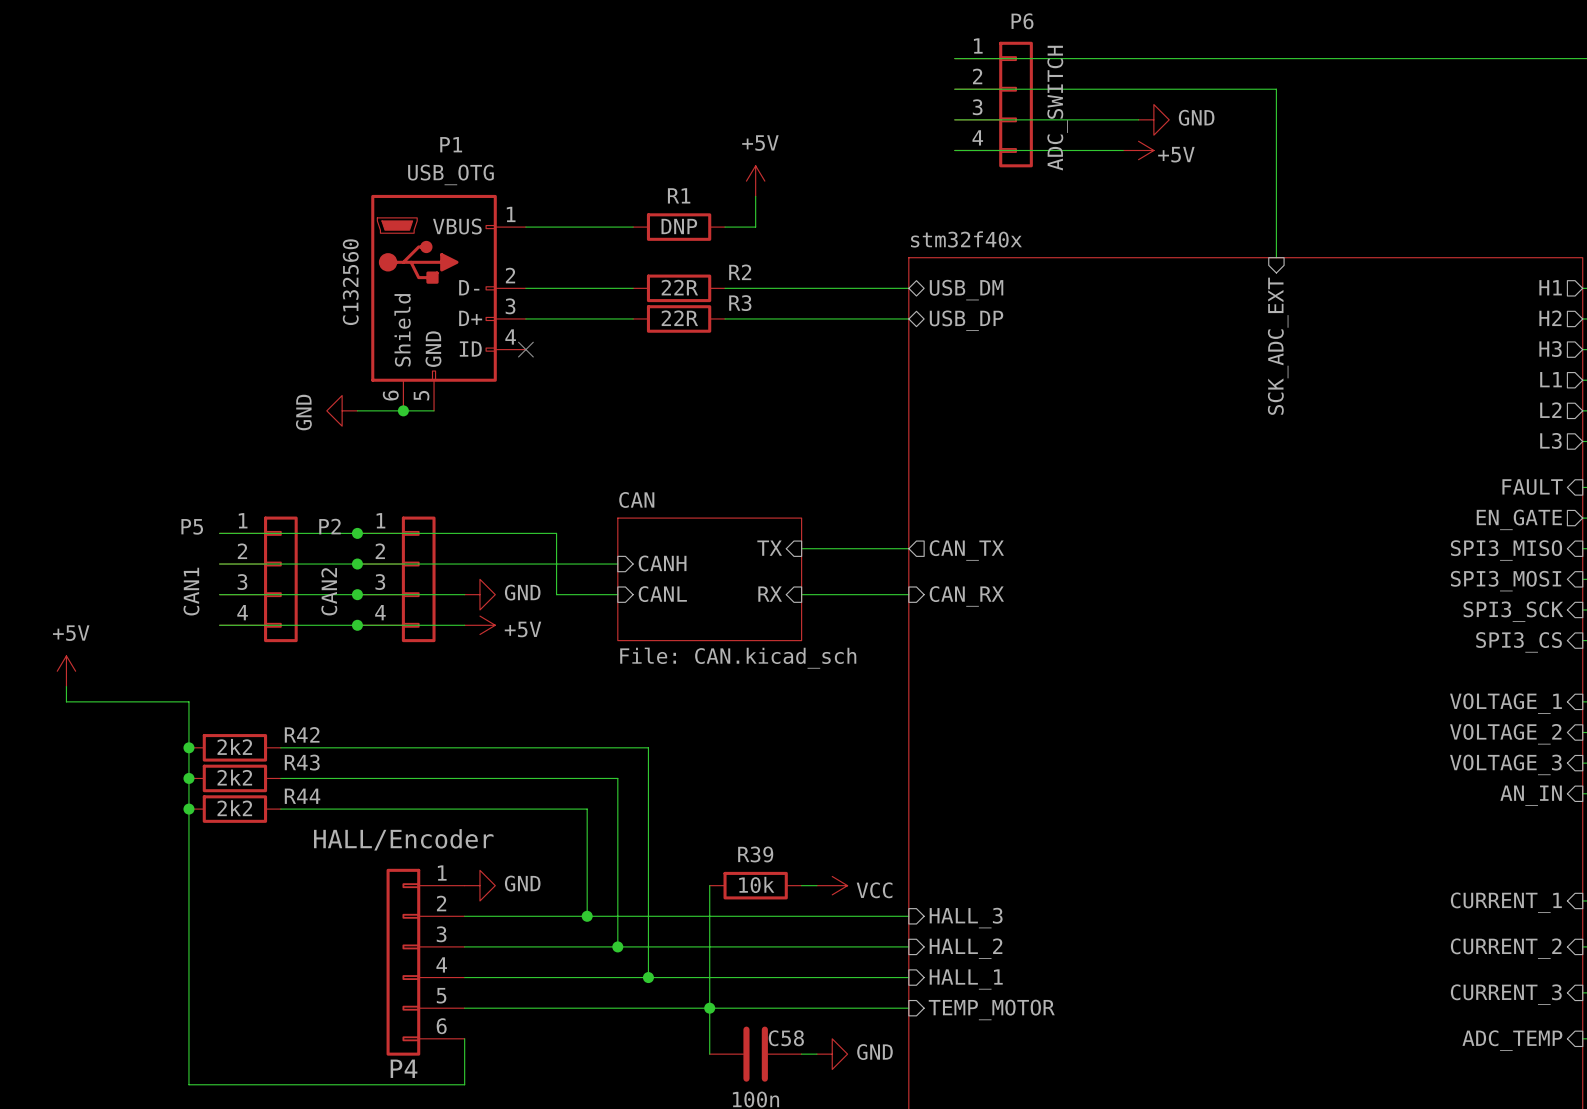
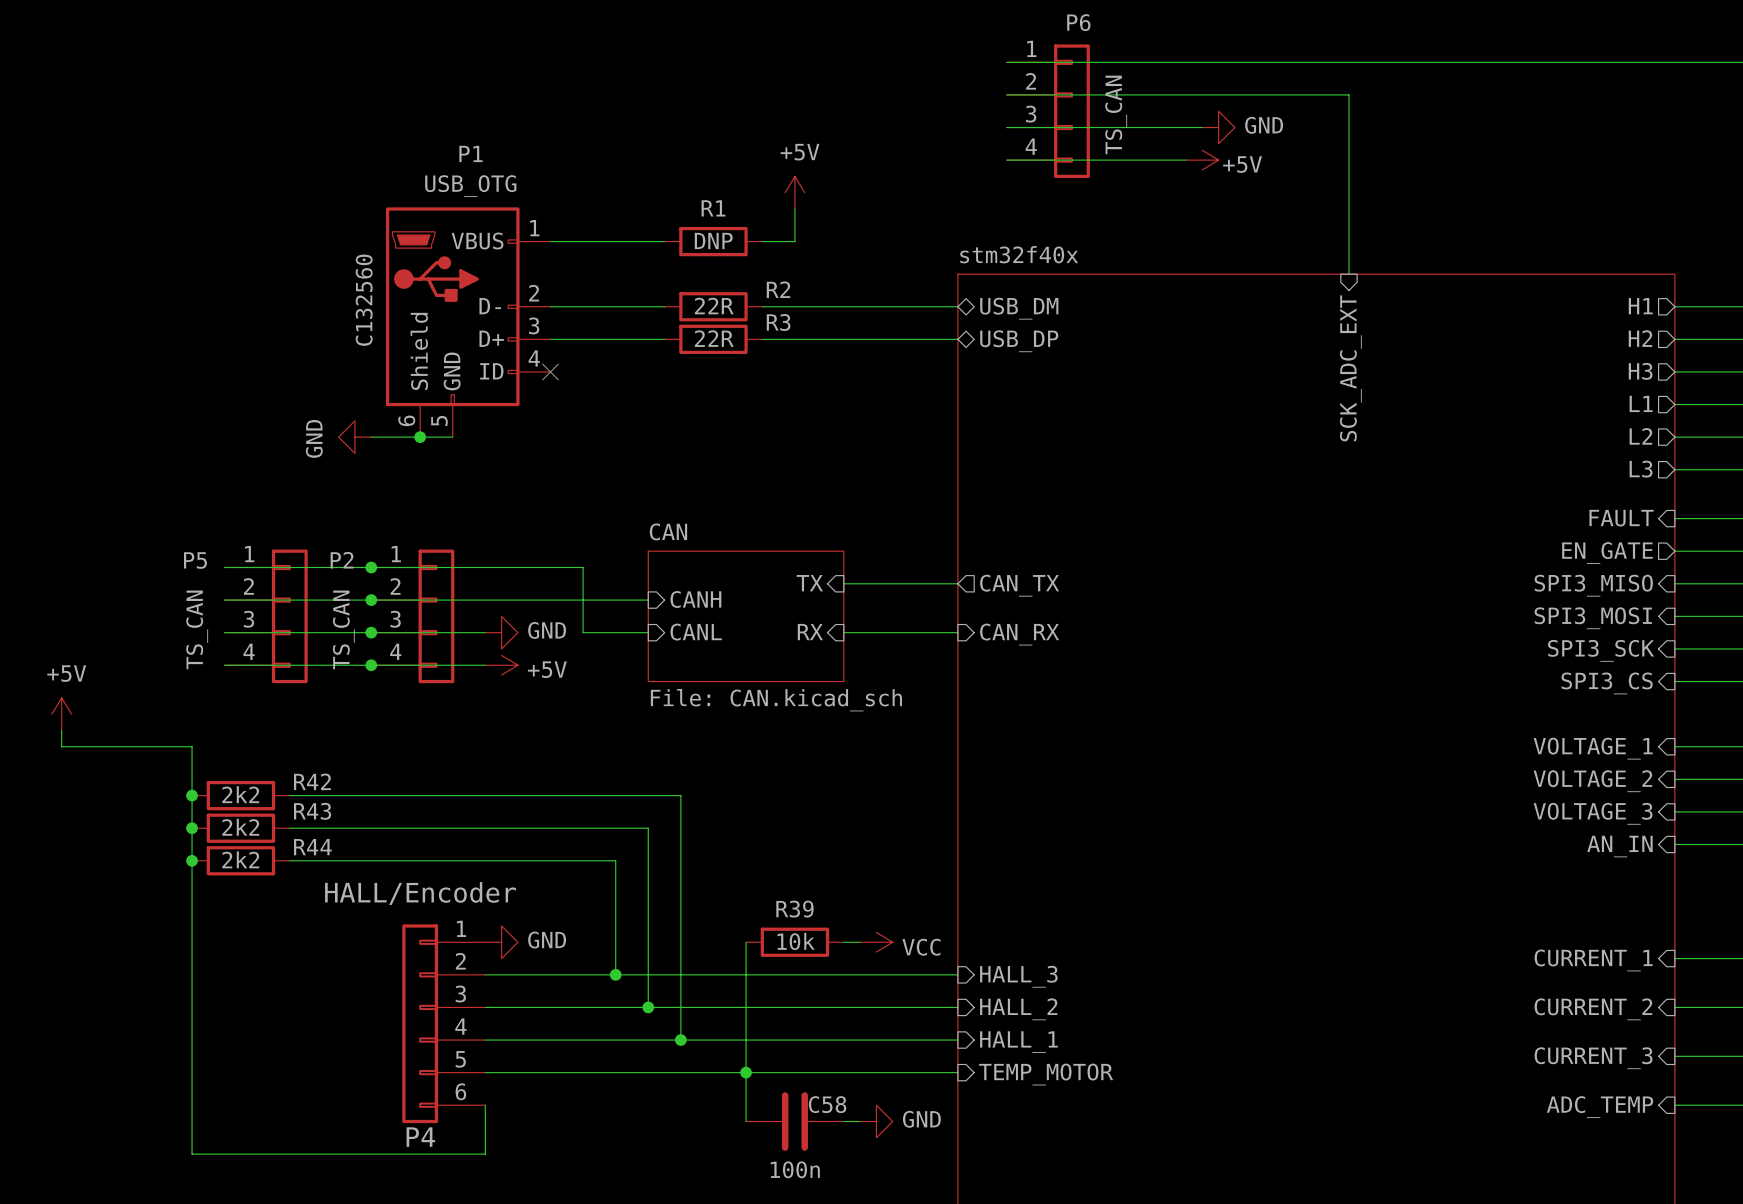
P6 value: ADC_SWITCH (1057, 108) -> TS_CAN (1116, 114)
P5 value: CAN1 (191, 591) -> TS_CAN (197, 629)
P2 value: CAN2 (329, 591) -> TS_CAN (343, 629)

